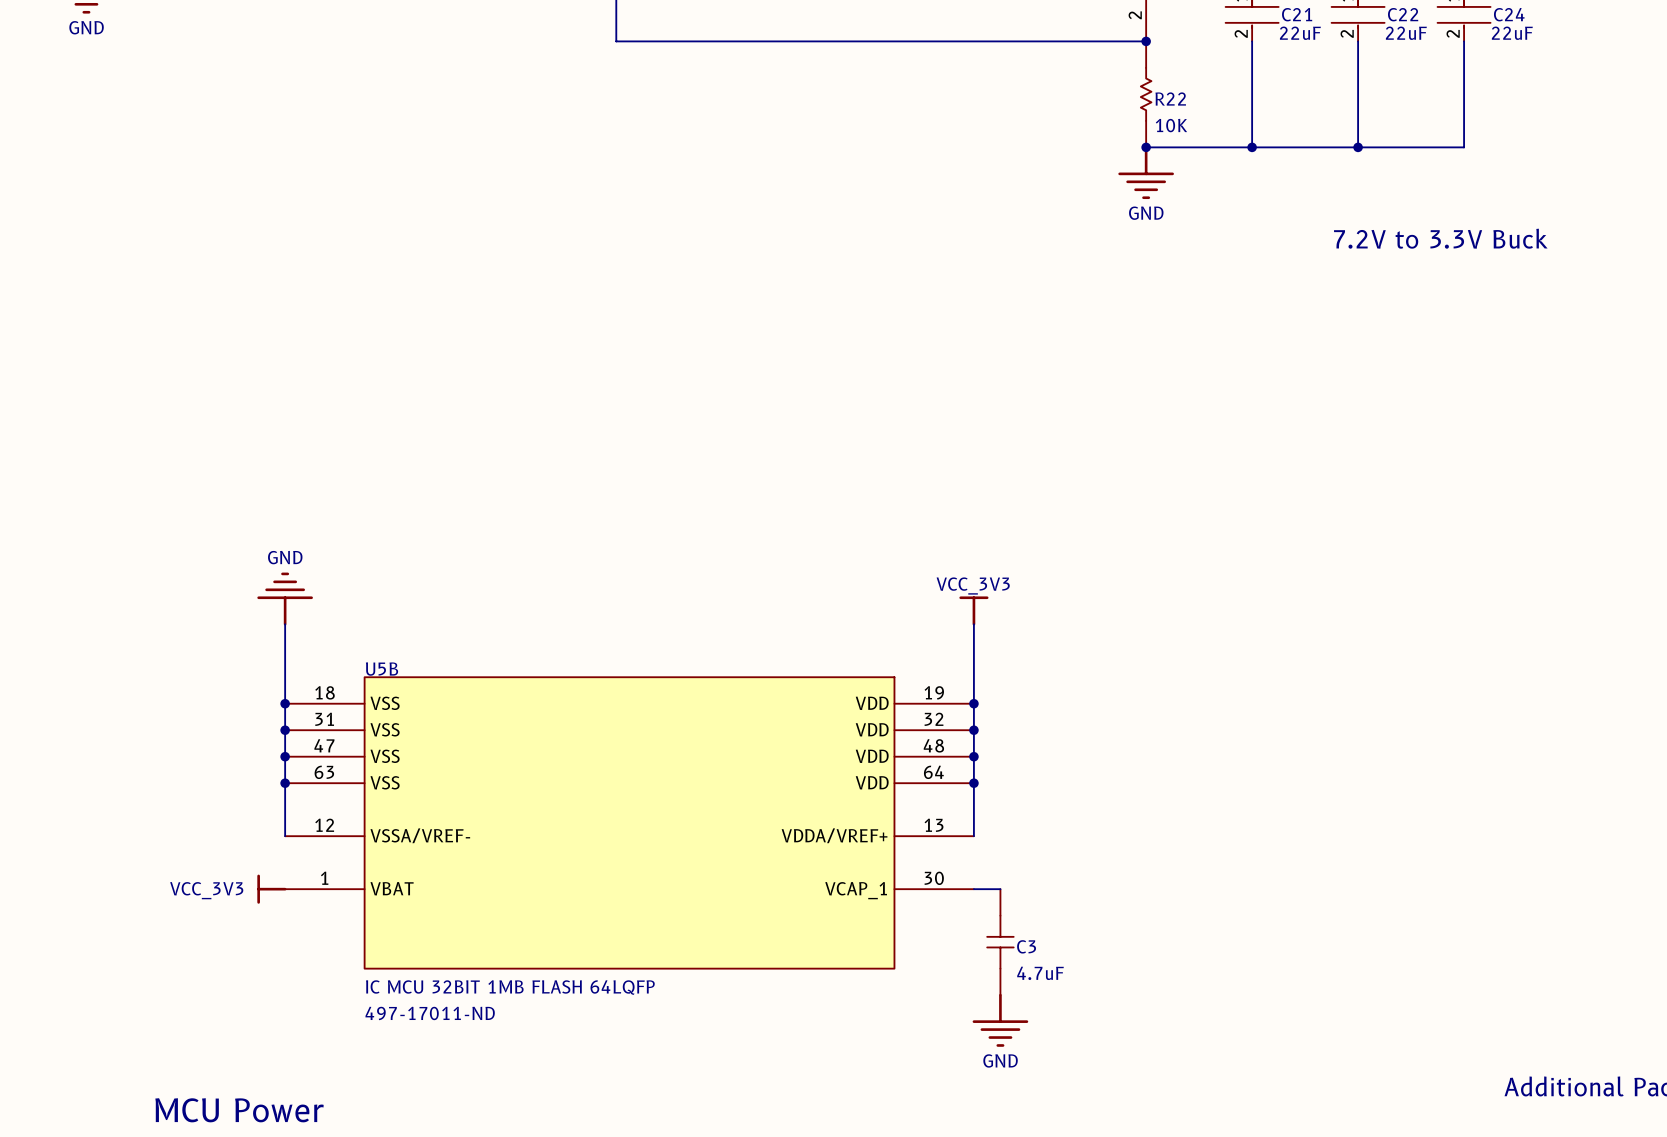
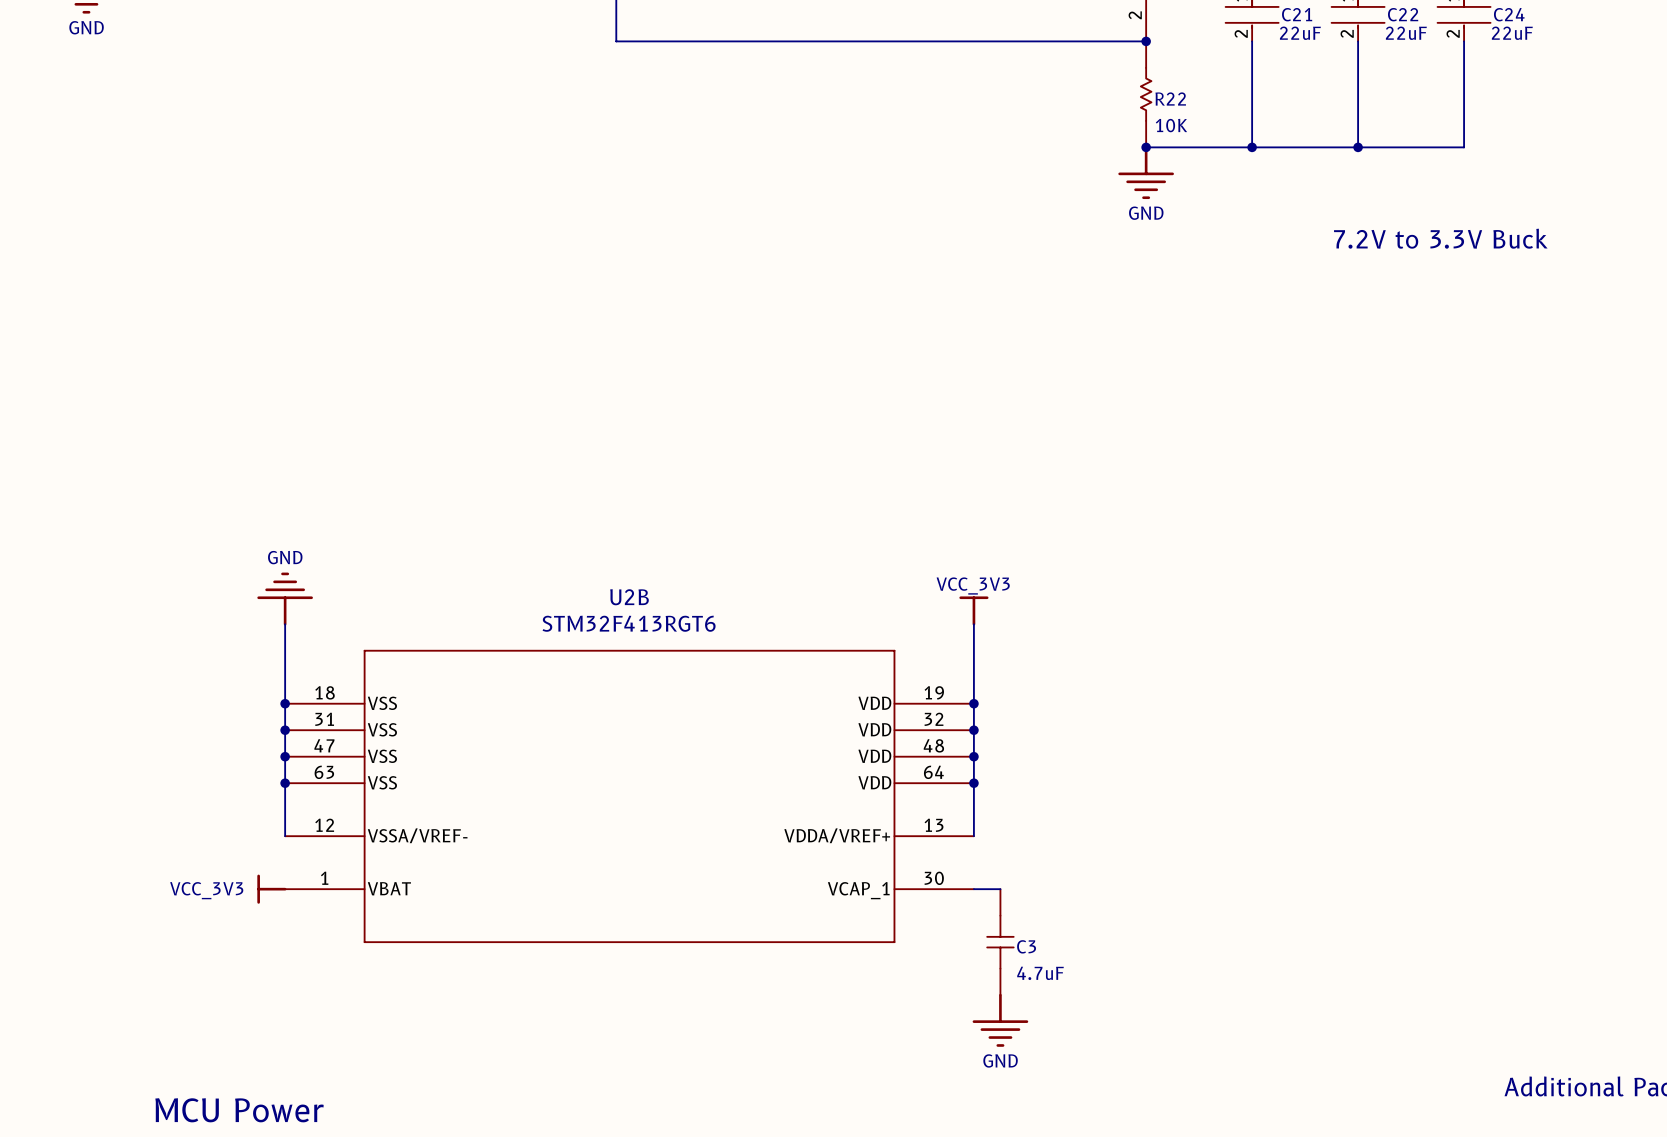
U2B: none -> STM32F413RGT6 (629, 796)
U5B: IC MCU 32BIT 1MB FLASH 64LQFP (629, 822) -> none

